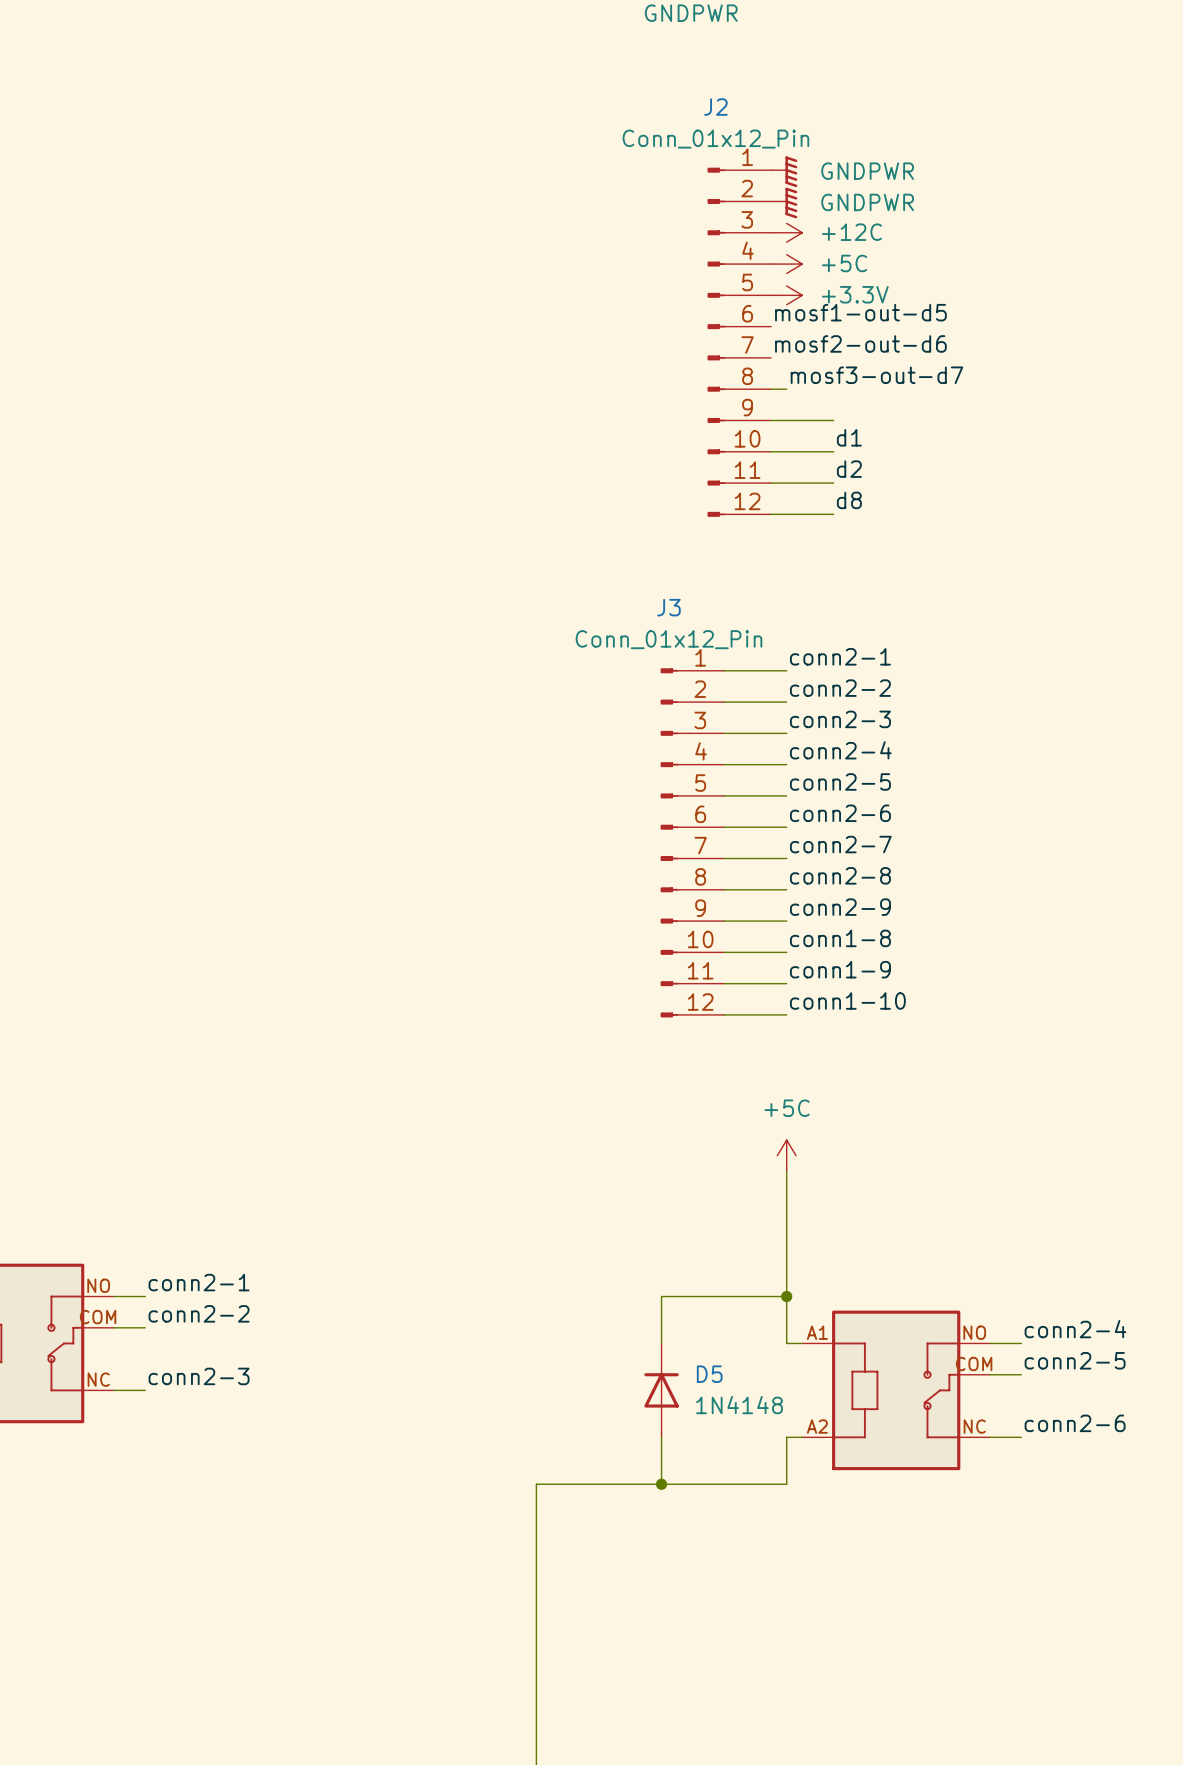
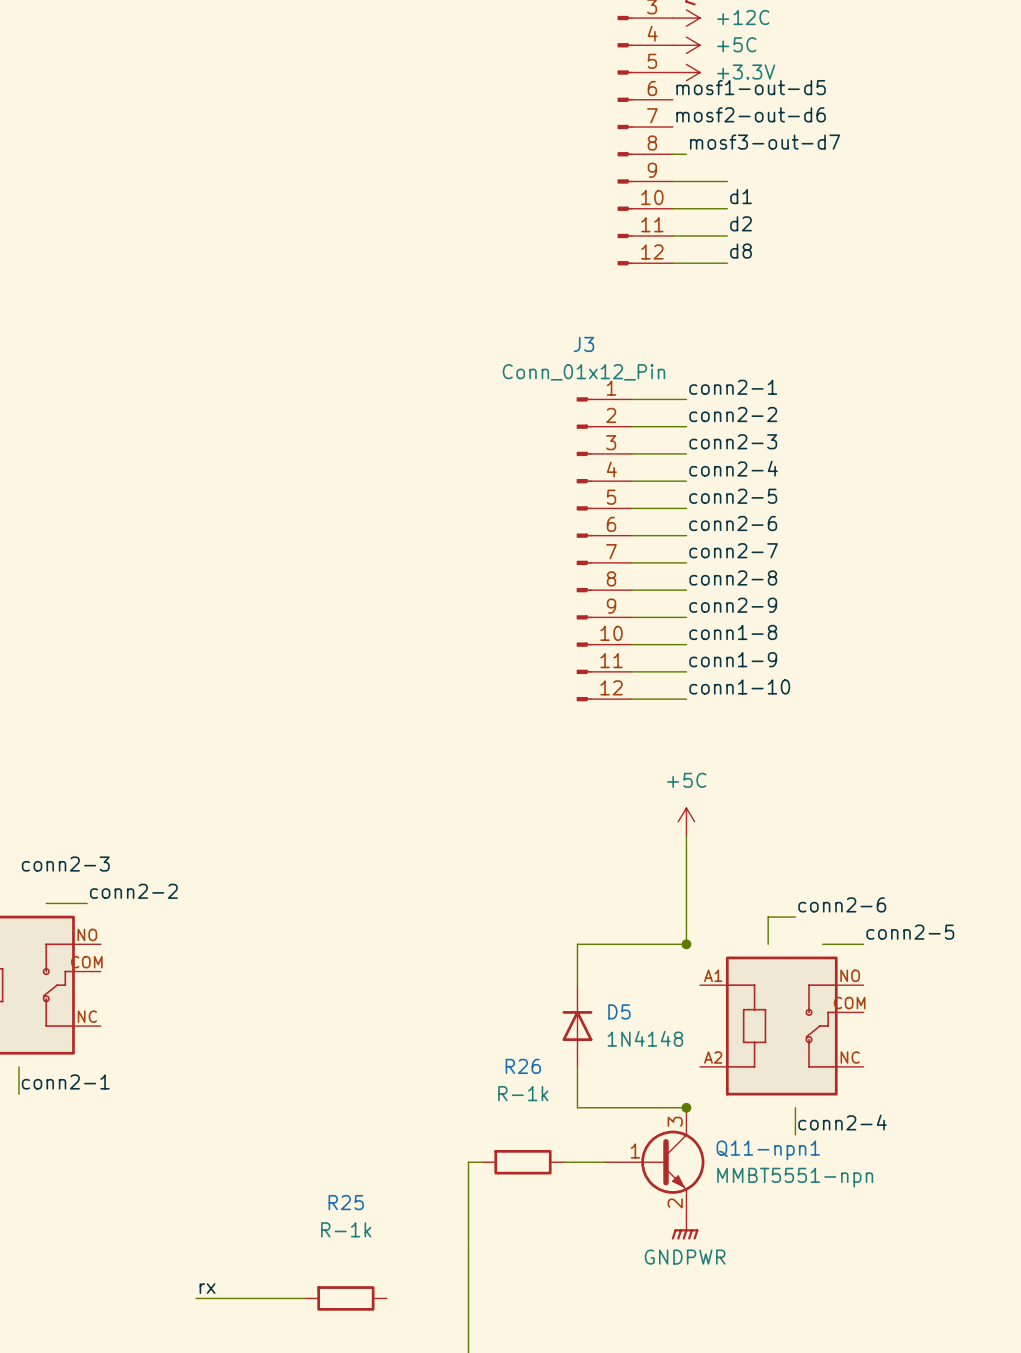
wire: none -> (46, 903) (87, 903)
wire: none -> (795, 917) (768, 917) (768, 944)
label position: conn2-1 (199, 1282) -> conn2-1 (65, 1081)
wire: (114, 1296) (145, 1296) -> none
wire: (786, 1296) (786, 1343) (802, 1343) -> none
wire: none -> (822, 944) (863, 944)
label position: conn2-2 (199, 1313) -> conn2-2 (133, 891)
wire: (114, 1327) (145, 1327) -> none
label position: conn2-4 (1075, 1329) -> conn2-4 (842, 1122)
wire: (990, 1343) (1021, 1343) -> none
label position: conn2-5 (1075, 1360) -> conn2-5 (910, 932)
wire: (990, 1374) (1021, 1374) -> none
label position: conn2-3 (199, 1376) -> conn2-3 (65, 864)
wire: (114, 1390) (145, 1390) -> none
label position: conn2-6 (1075, 1423) -> conn2-6 (842, 904)
wire: none -> (18, 1066) (18, 1094)
wire: (802, 1437) (786, 1437) (786, 1484) -> none
wire: (990, 1437) (1021, 1437) -> none
wire: (661, 1484) (536, 1484) (536, 1546) -> (482, 1162) (468, 1162)
junction: (661, 1484) -> none
junction: none -> (686, 1107)
wire: none -> (795, 1107) (795, 1135)
R26: none -> R-1k (522, 1162)
wire: none -> (563, 1162) (604, 1162)
Q11-npn1: none -> MMBT5551-npn (654, 1162)
power symbol: none -> GNDPWR (685, 1228)
label: none -> rx (207, 1288)
wire: none -> (196, 1298) (305, 1298)
R25: none -> R-1k (345, 1298)

